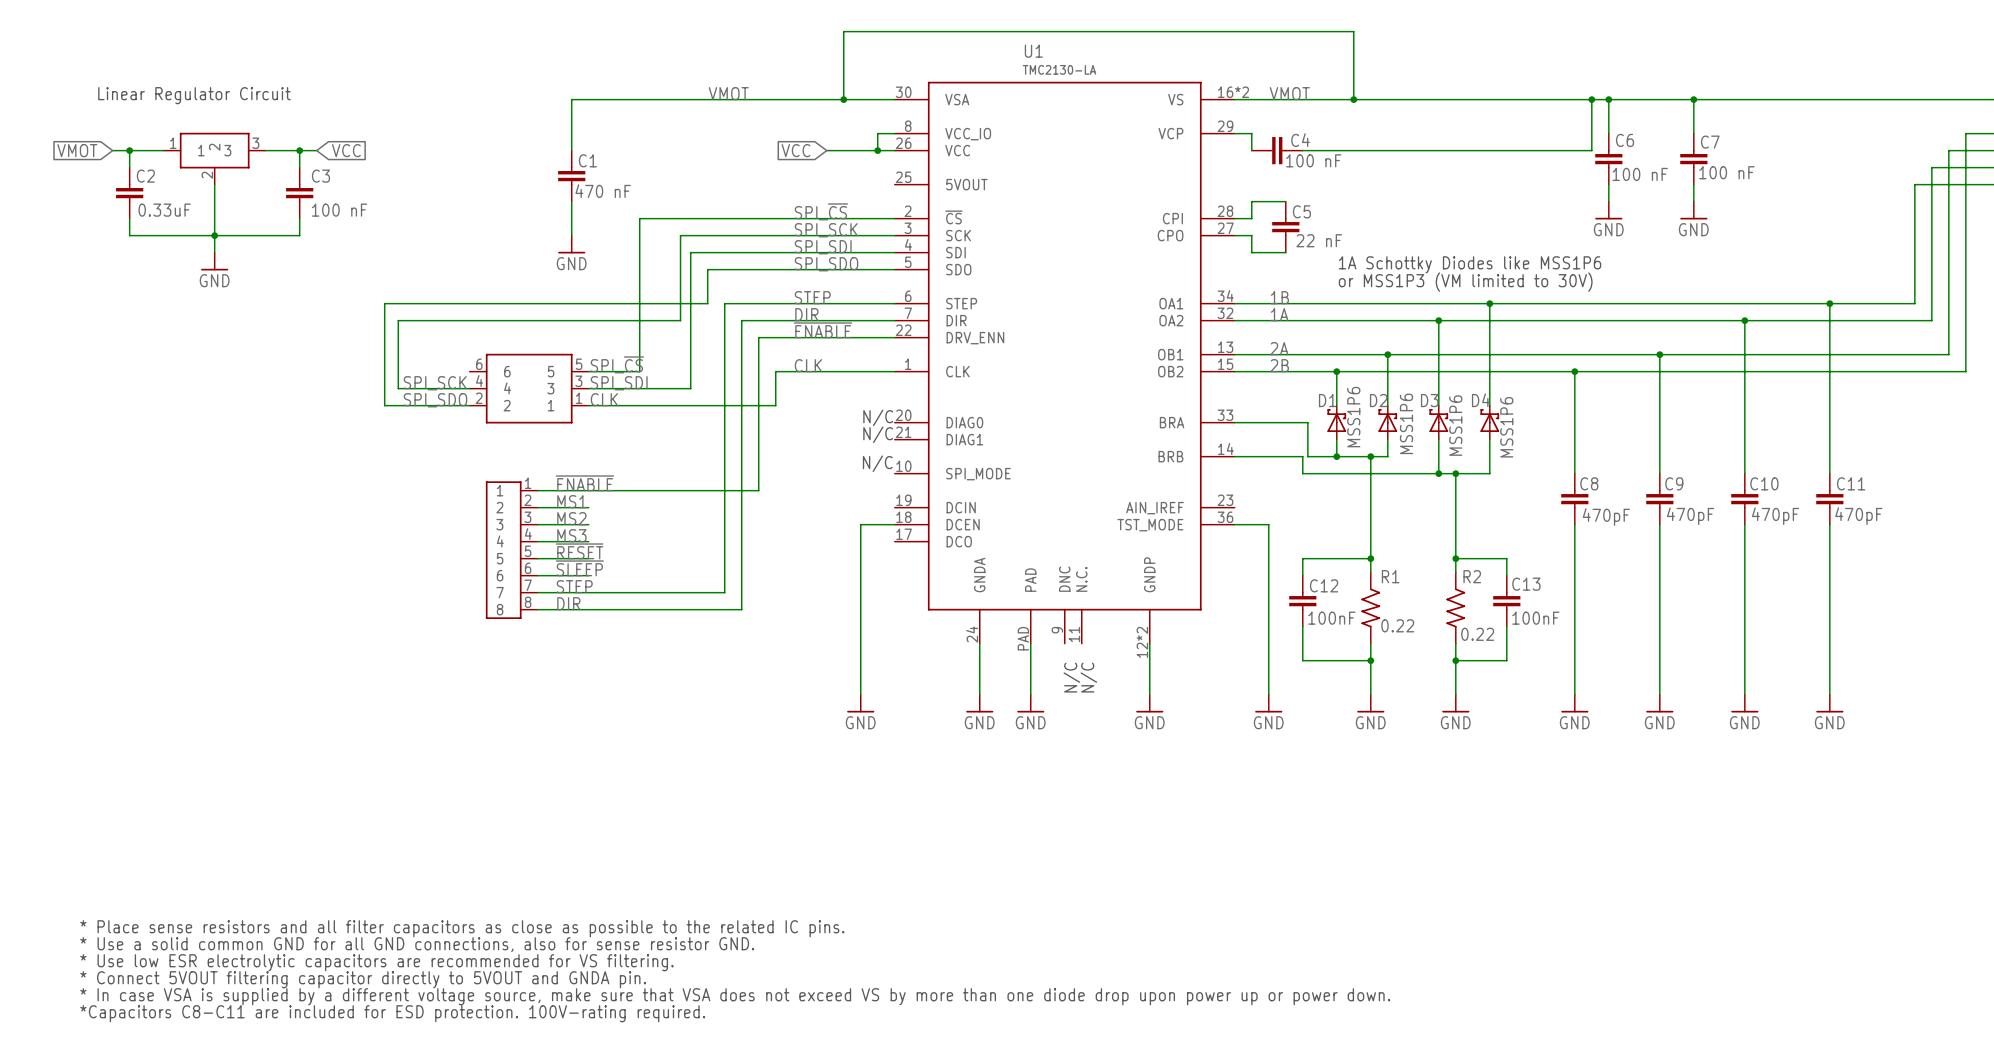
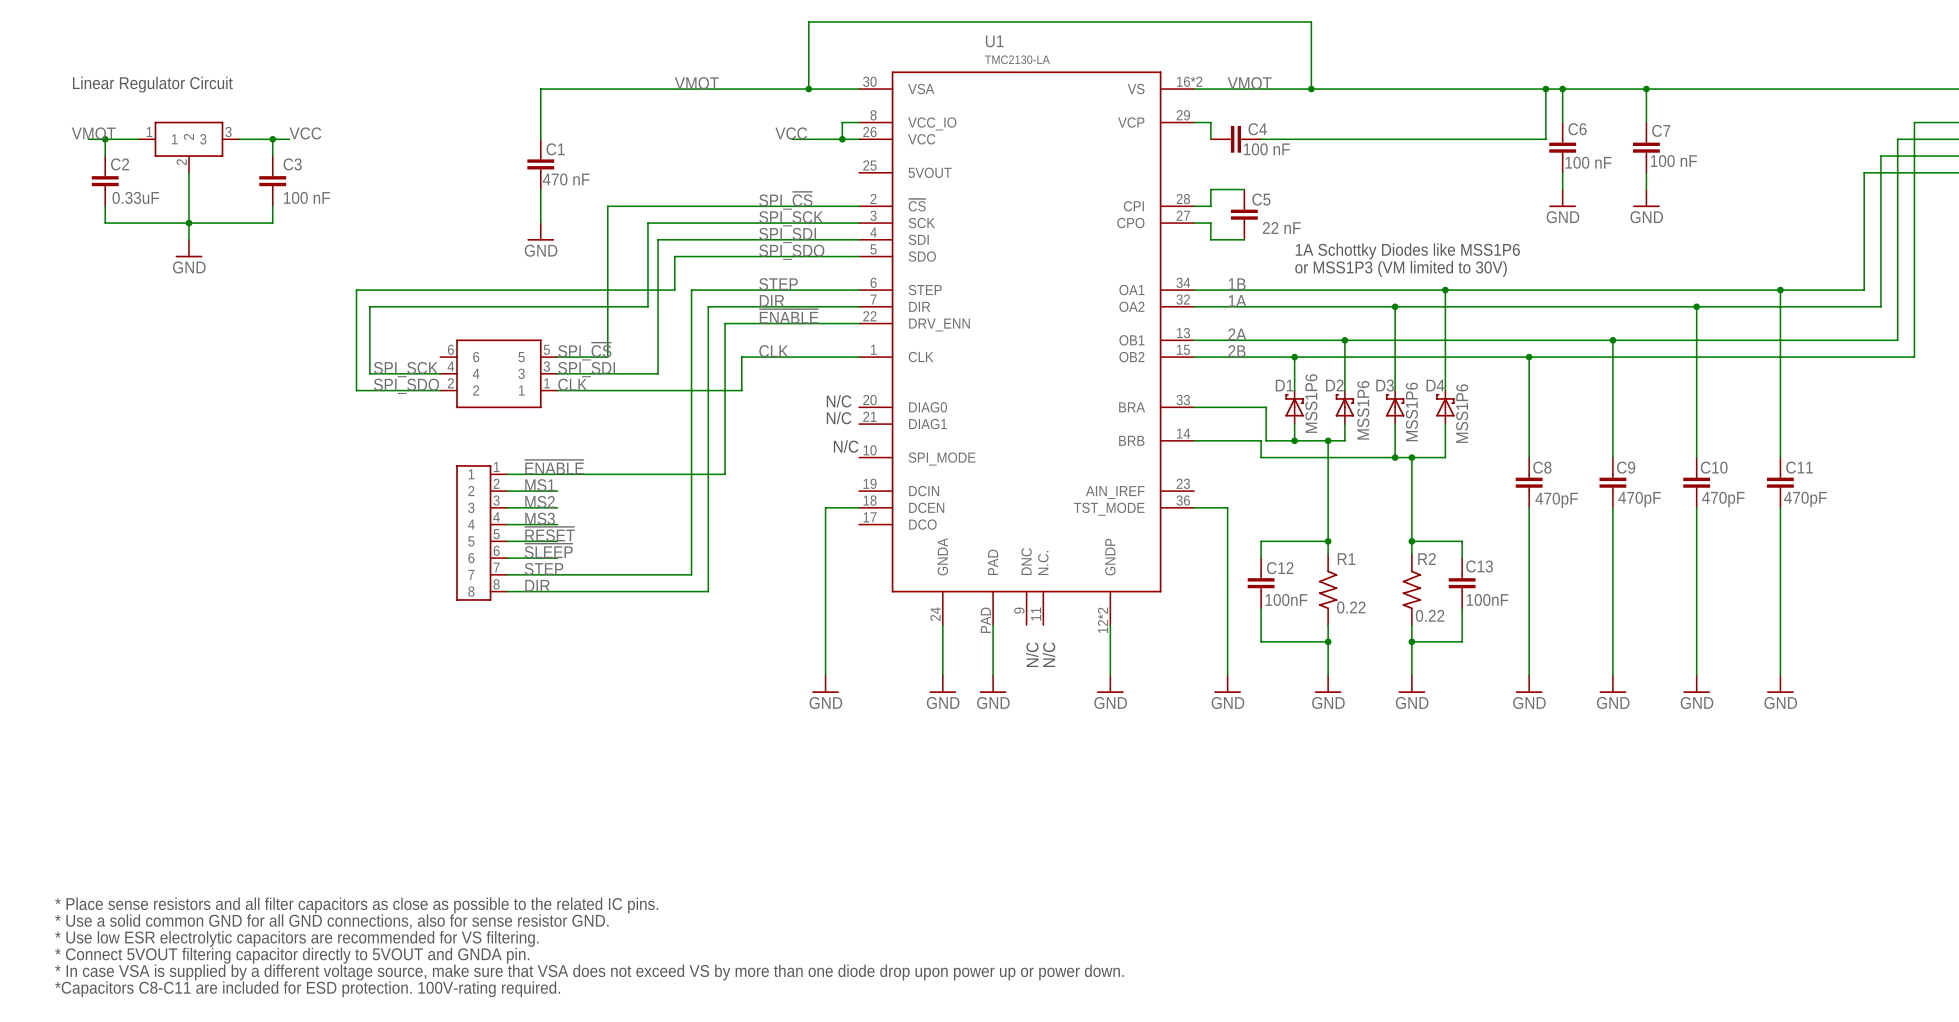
label: none -> VMOT (93, 133)
label: none -> VCC (305, 133)
label: none -> VCC (791, 133)
global label: VMOT (77, 150) -> none
global label: VCC (346, 150) -> none
global label: VCC (796, 150) -> none

